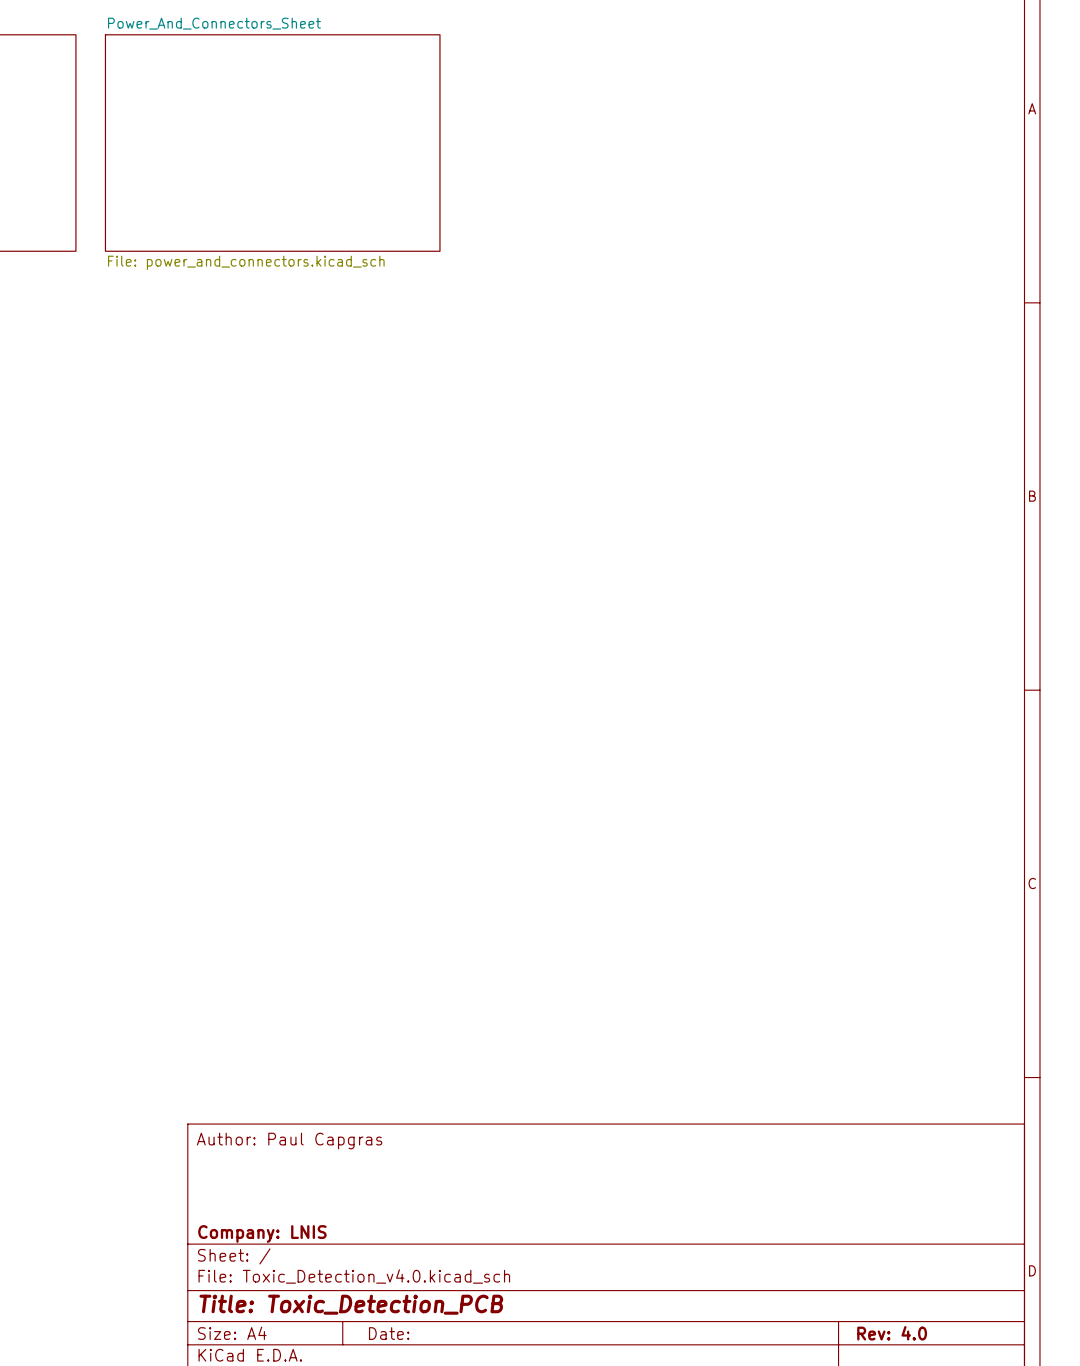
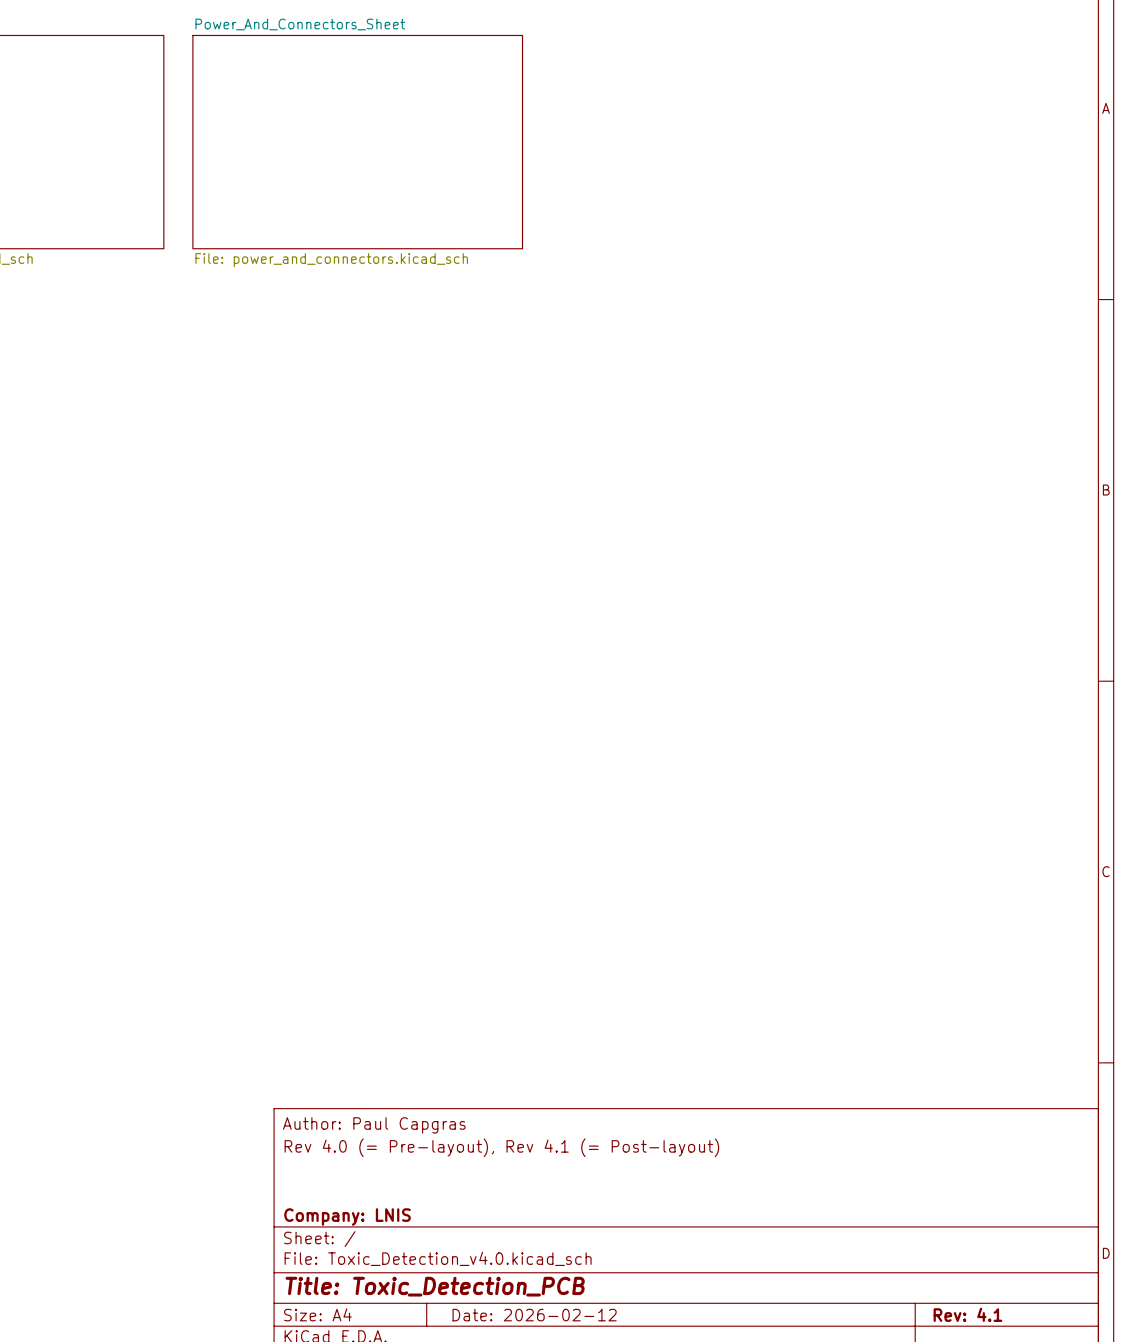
title block: none -> Rev 4.0 (= Pre-layout), Rev 4.1 (= Post-layout) (501, 1147)
title block: Date: (389, 1333) -> Date: 2026-02-12 (534, 1315)
title block: Rev: 4.0 (892, 1333) -> Rev: 4.1 (967, 1314)

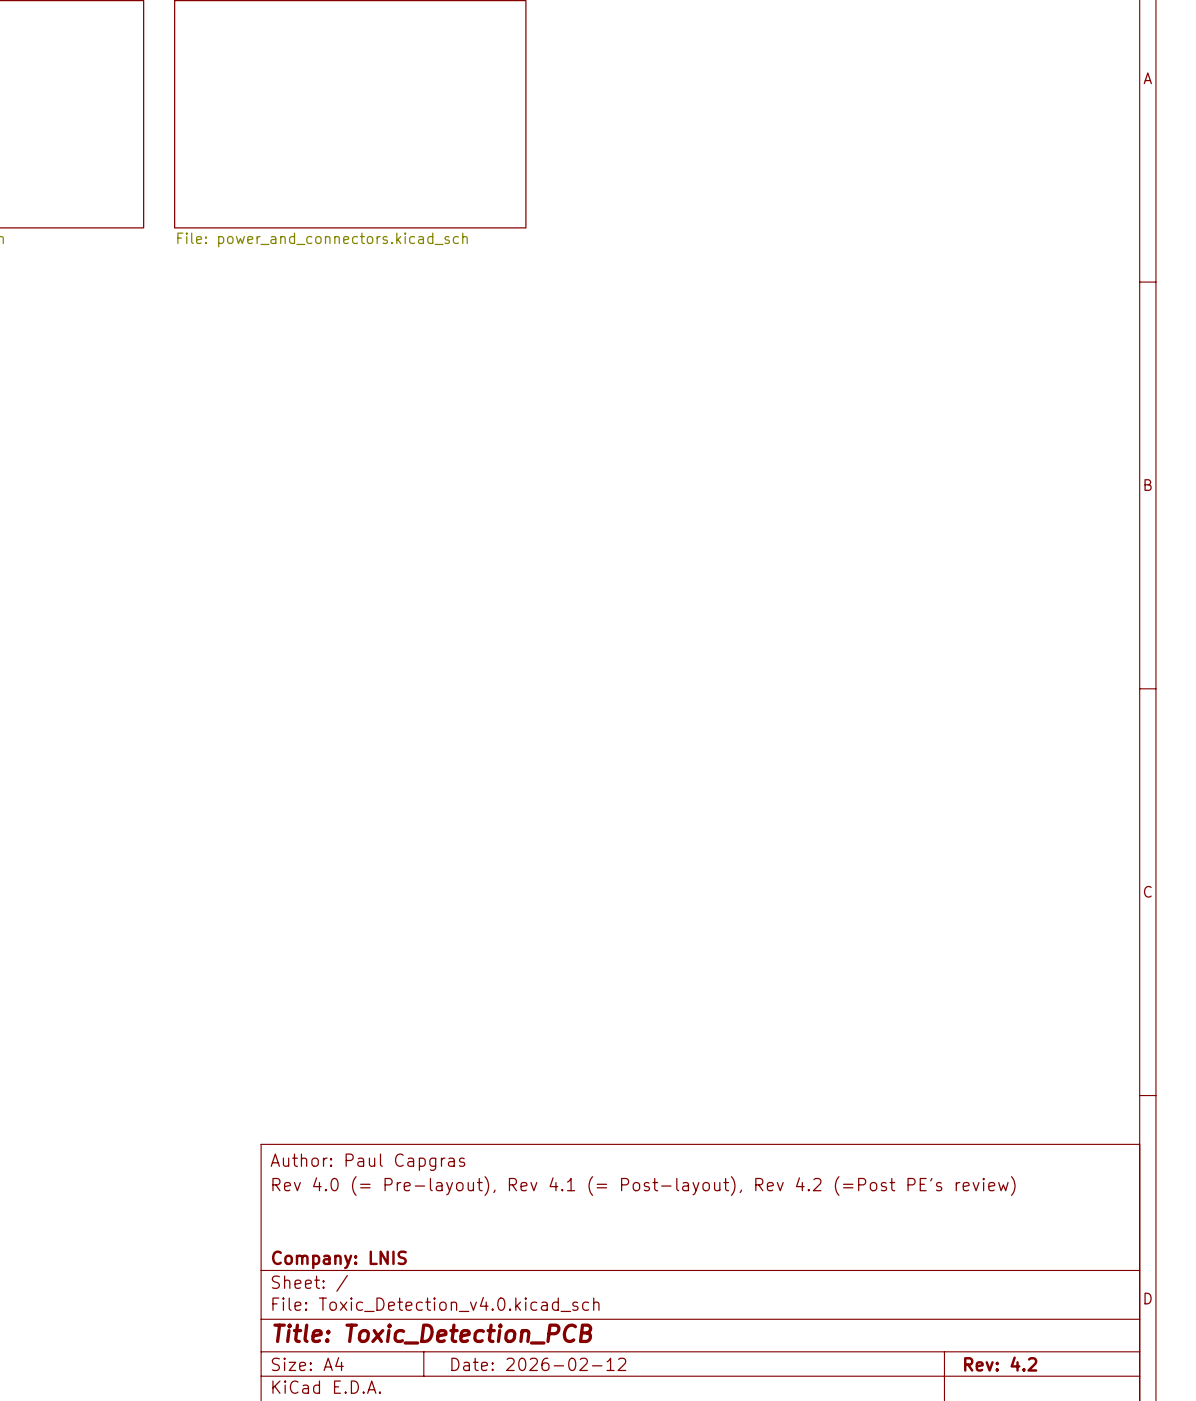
title block: Rev 4.0 (= Pre-layout), Rev 4.1 (= Post-layout) (501, 1147) -> Rev 4.0 (= Pre-layout), Rev 4.1 (= Post-layout), Rev 4.2 (=Post PE's review) (643, 1186)
title block: Rev: 4.1 (967, 1314) -> Rev: 4.2 (1000, 1364)

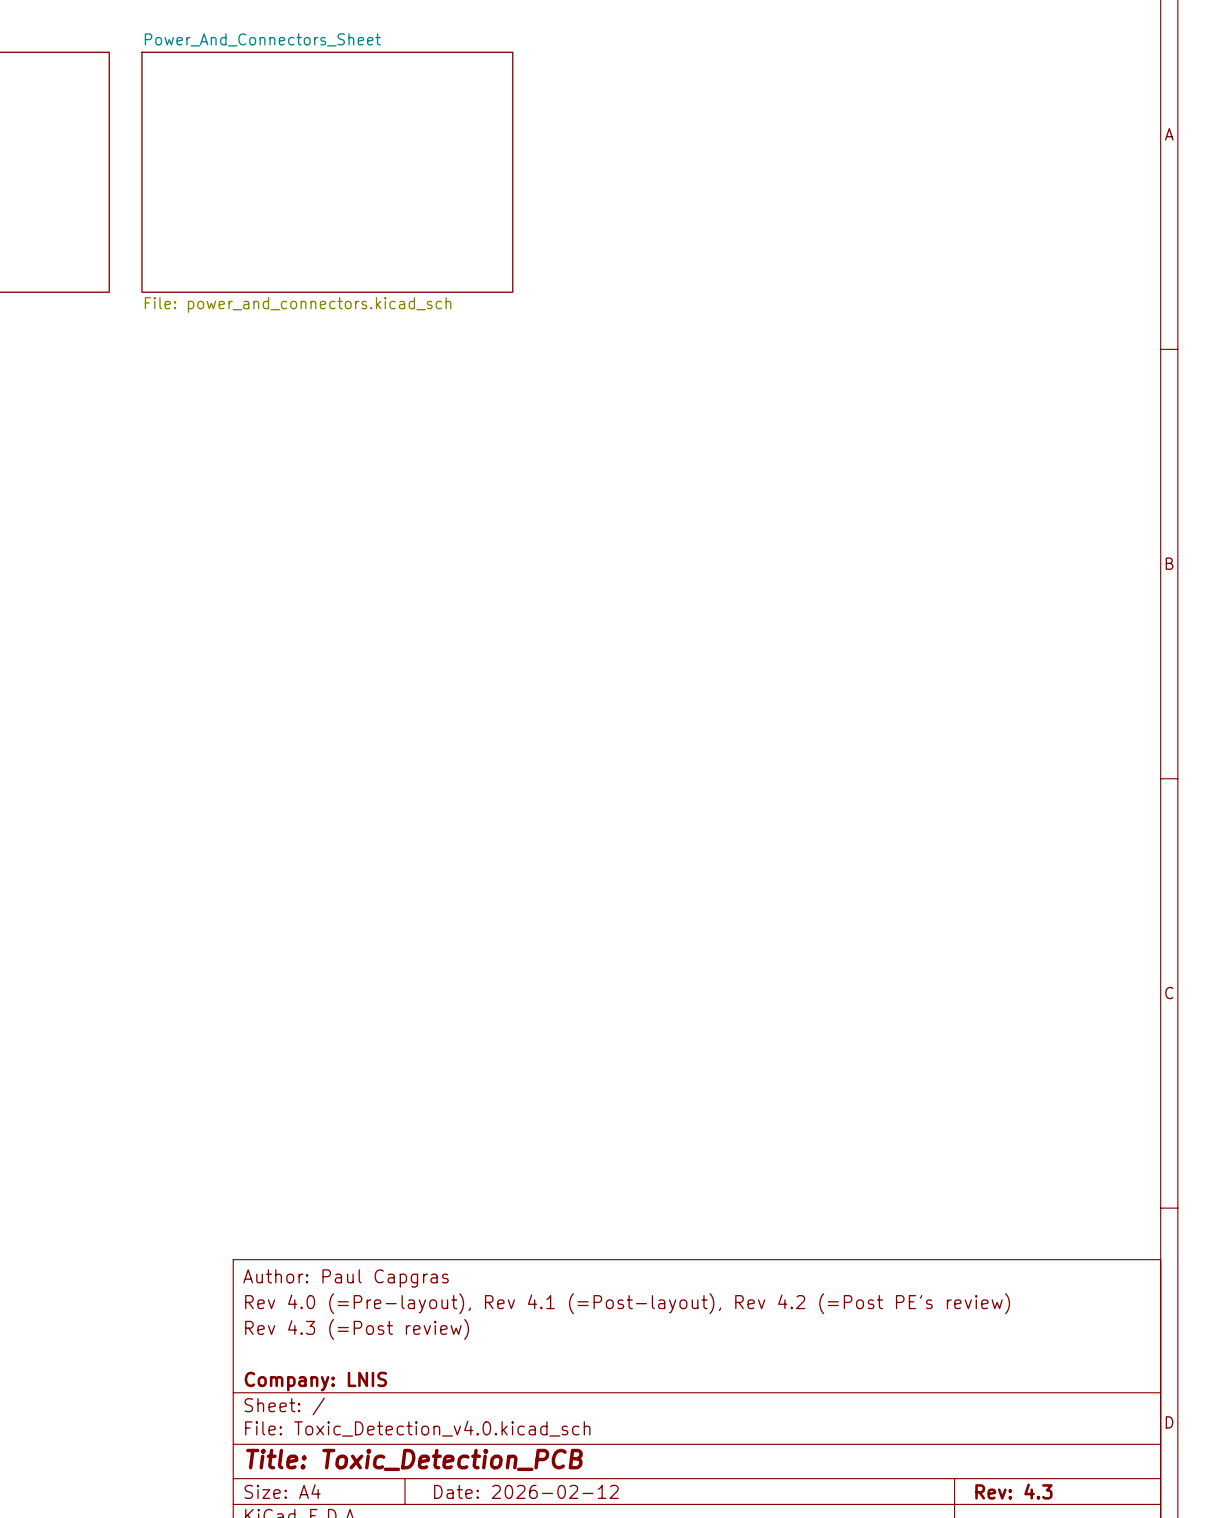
title block: Rev 4.0 (= Pre-layout), Rev 4.1 (= Post-layout), Rev 4.2 (=Post PE's review) (643, 1186) -> Rev 4.0 (=Pre-layout), Rev 4.1 (=Post-layout), Rev 4.2 (=Post PE's review) (627, 1303)
title block: none -> Rev 4.3 (=Post review) (357, 1329)
title block: Rev: 4.2 (1000, 1364) -> Rev: 4.3 (1013, 1491)

